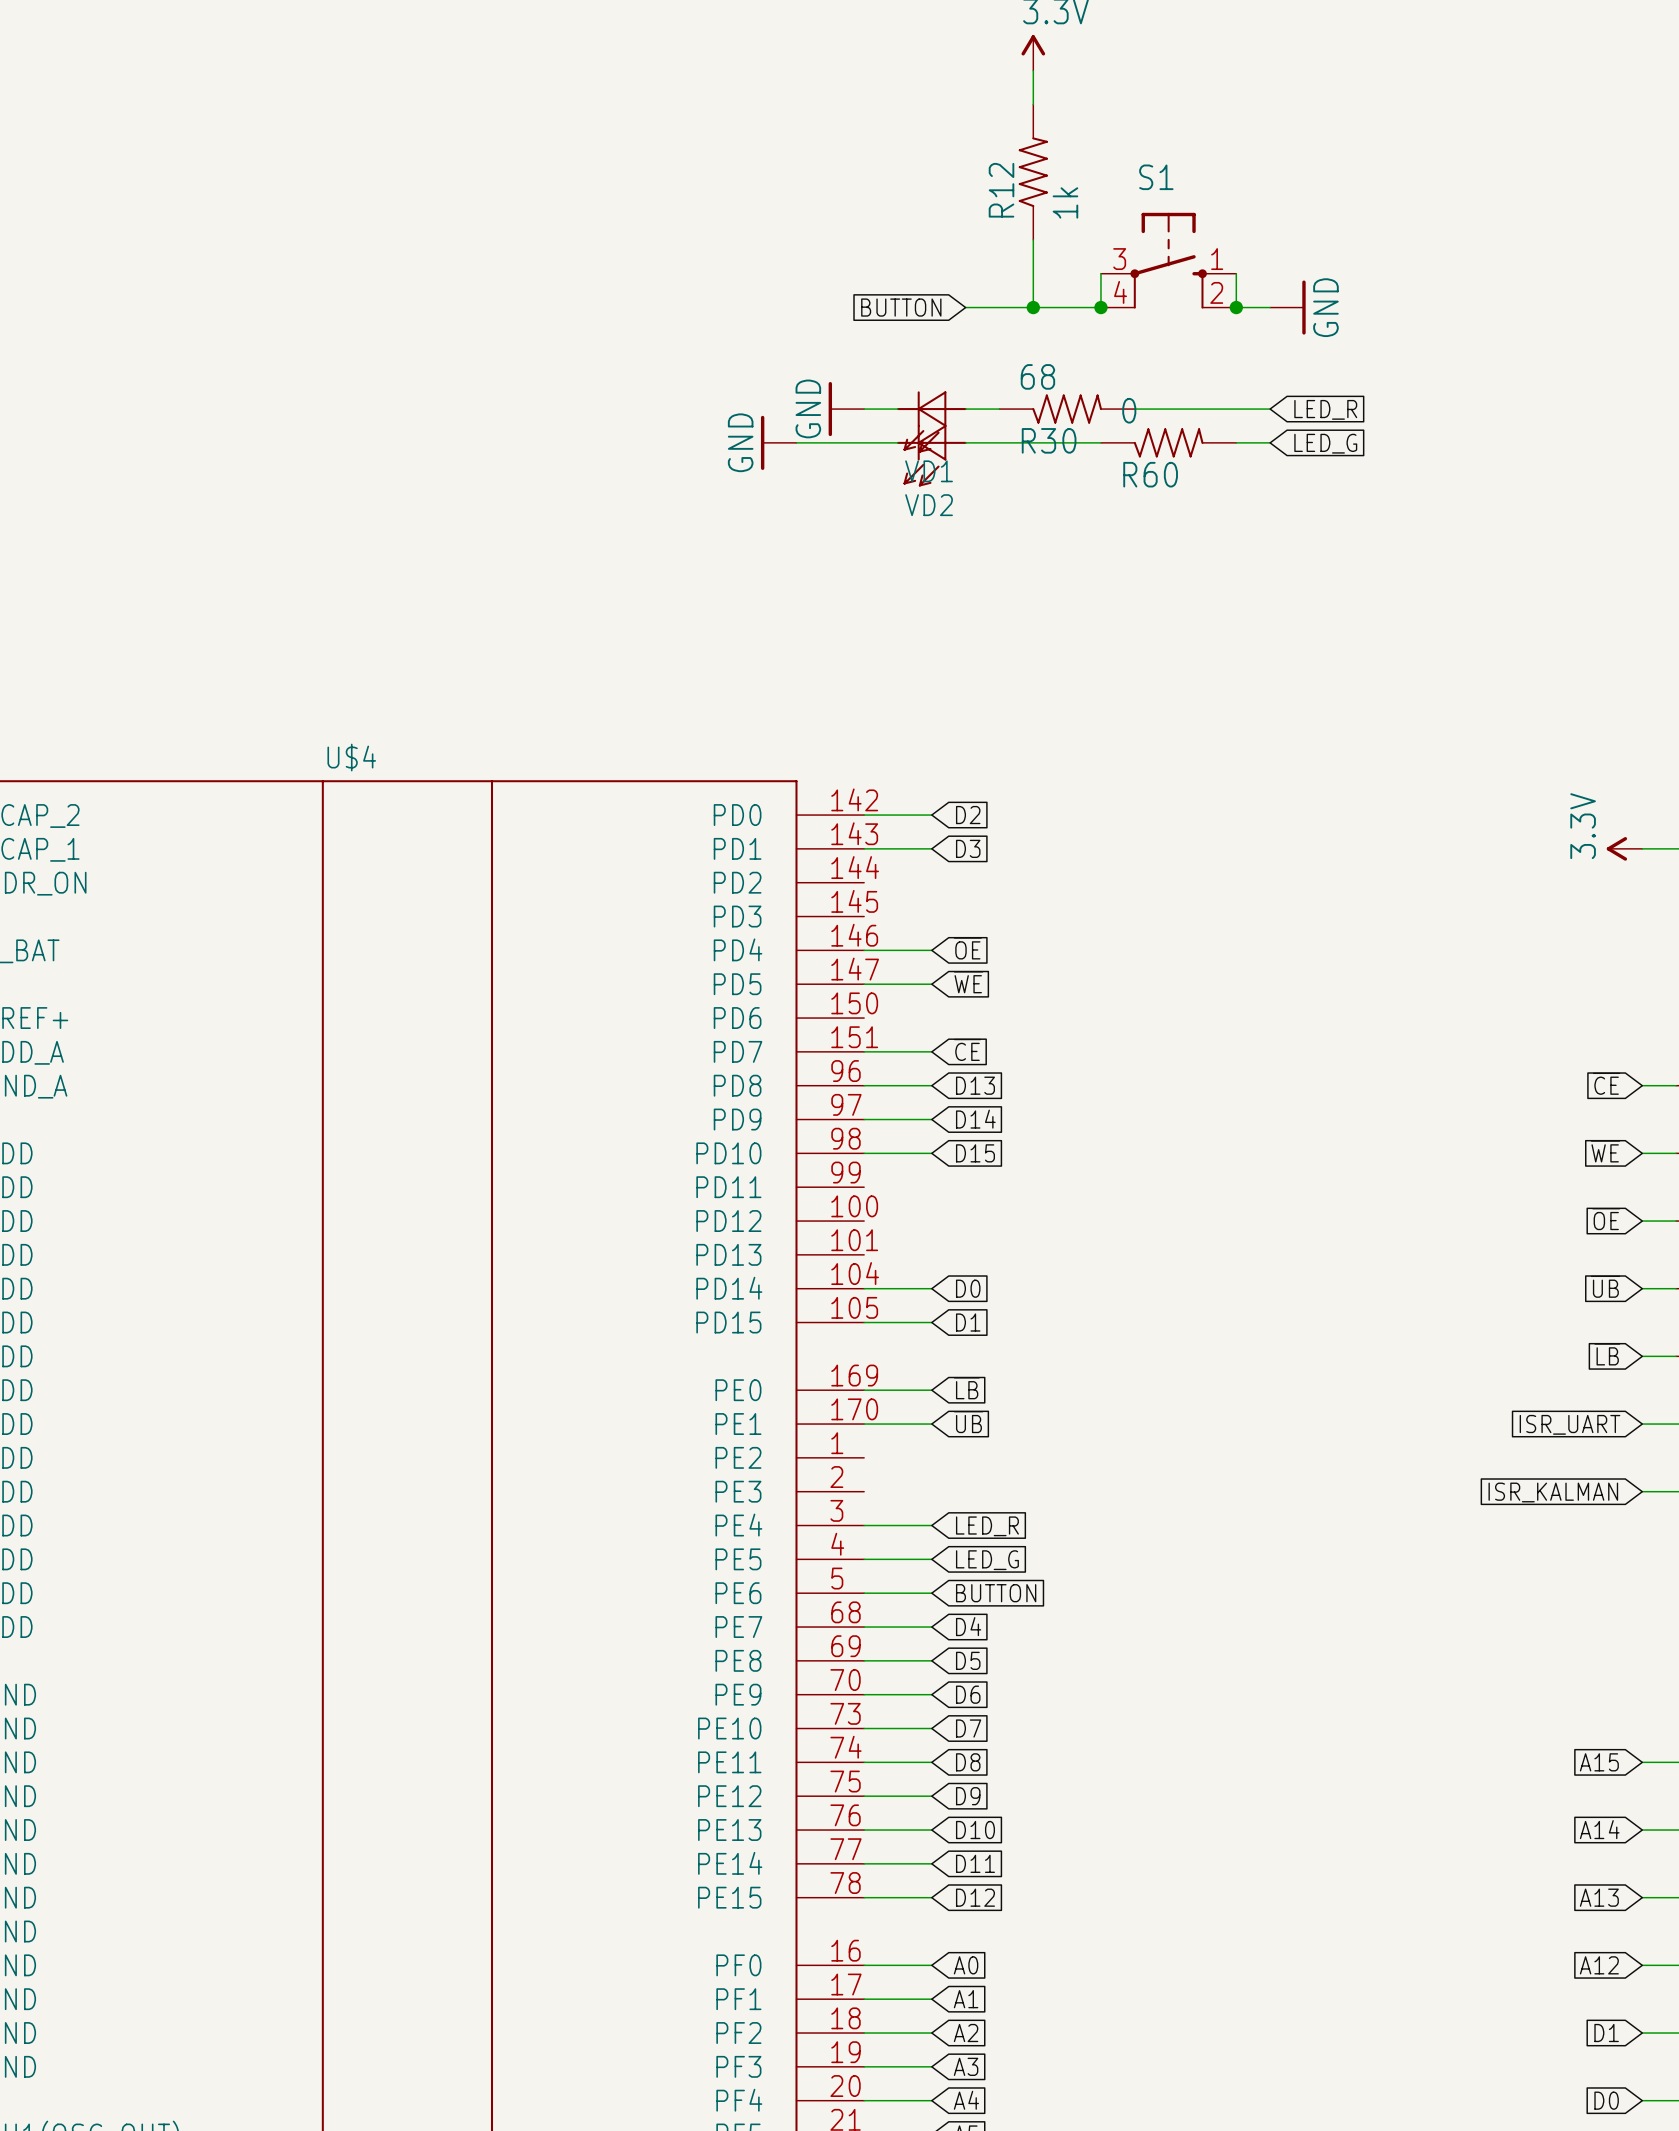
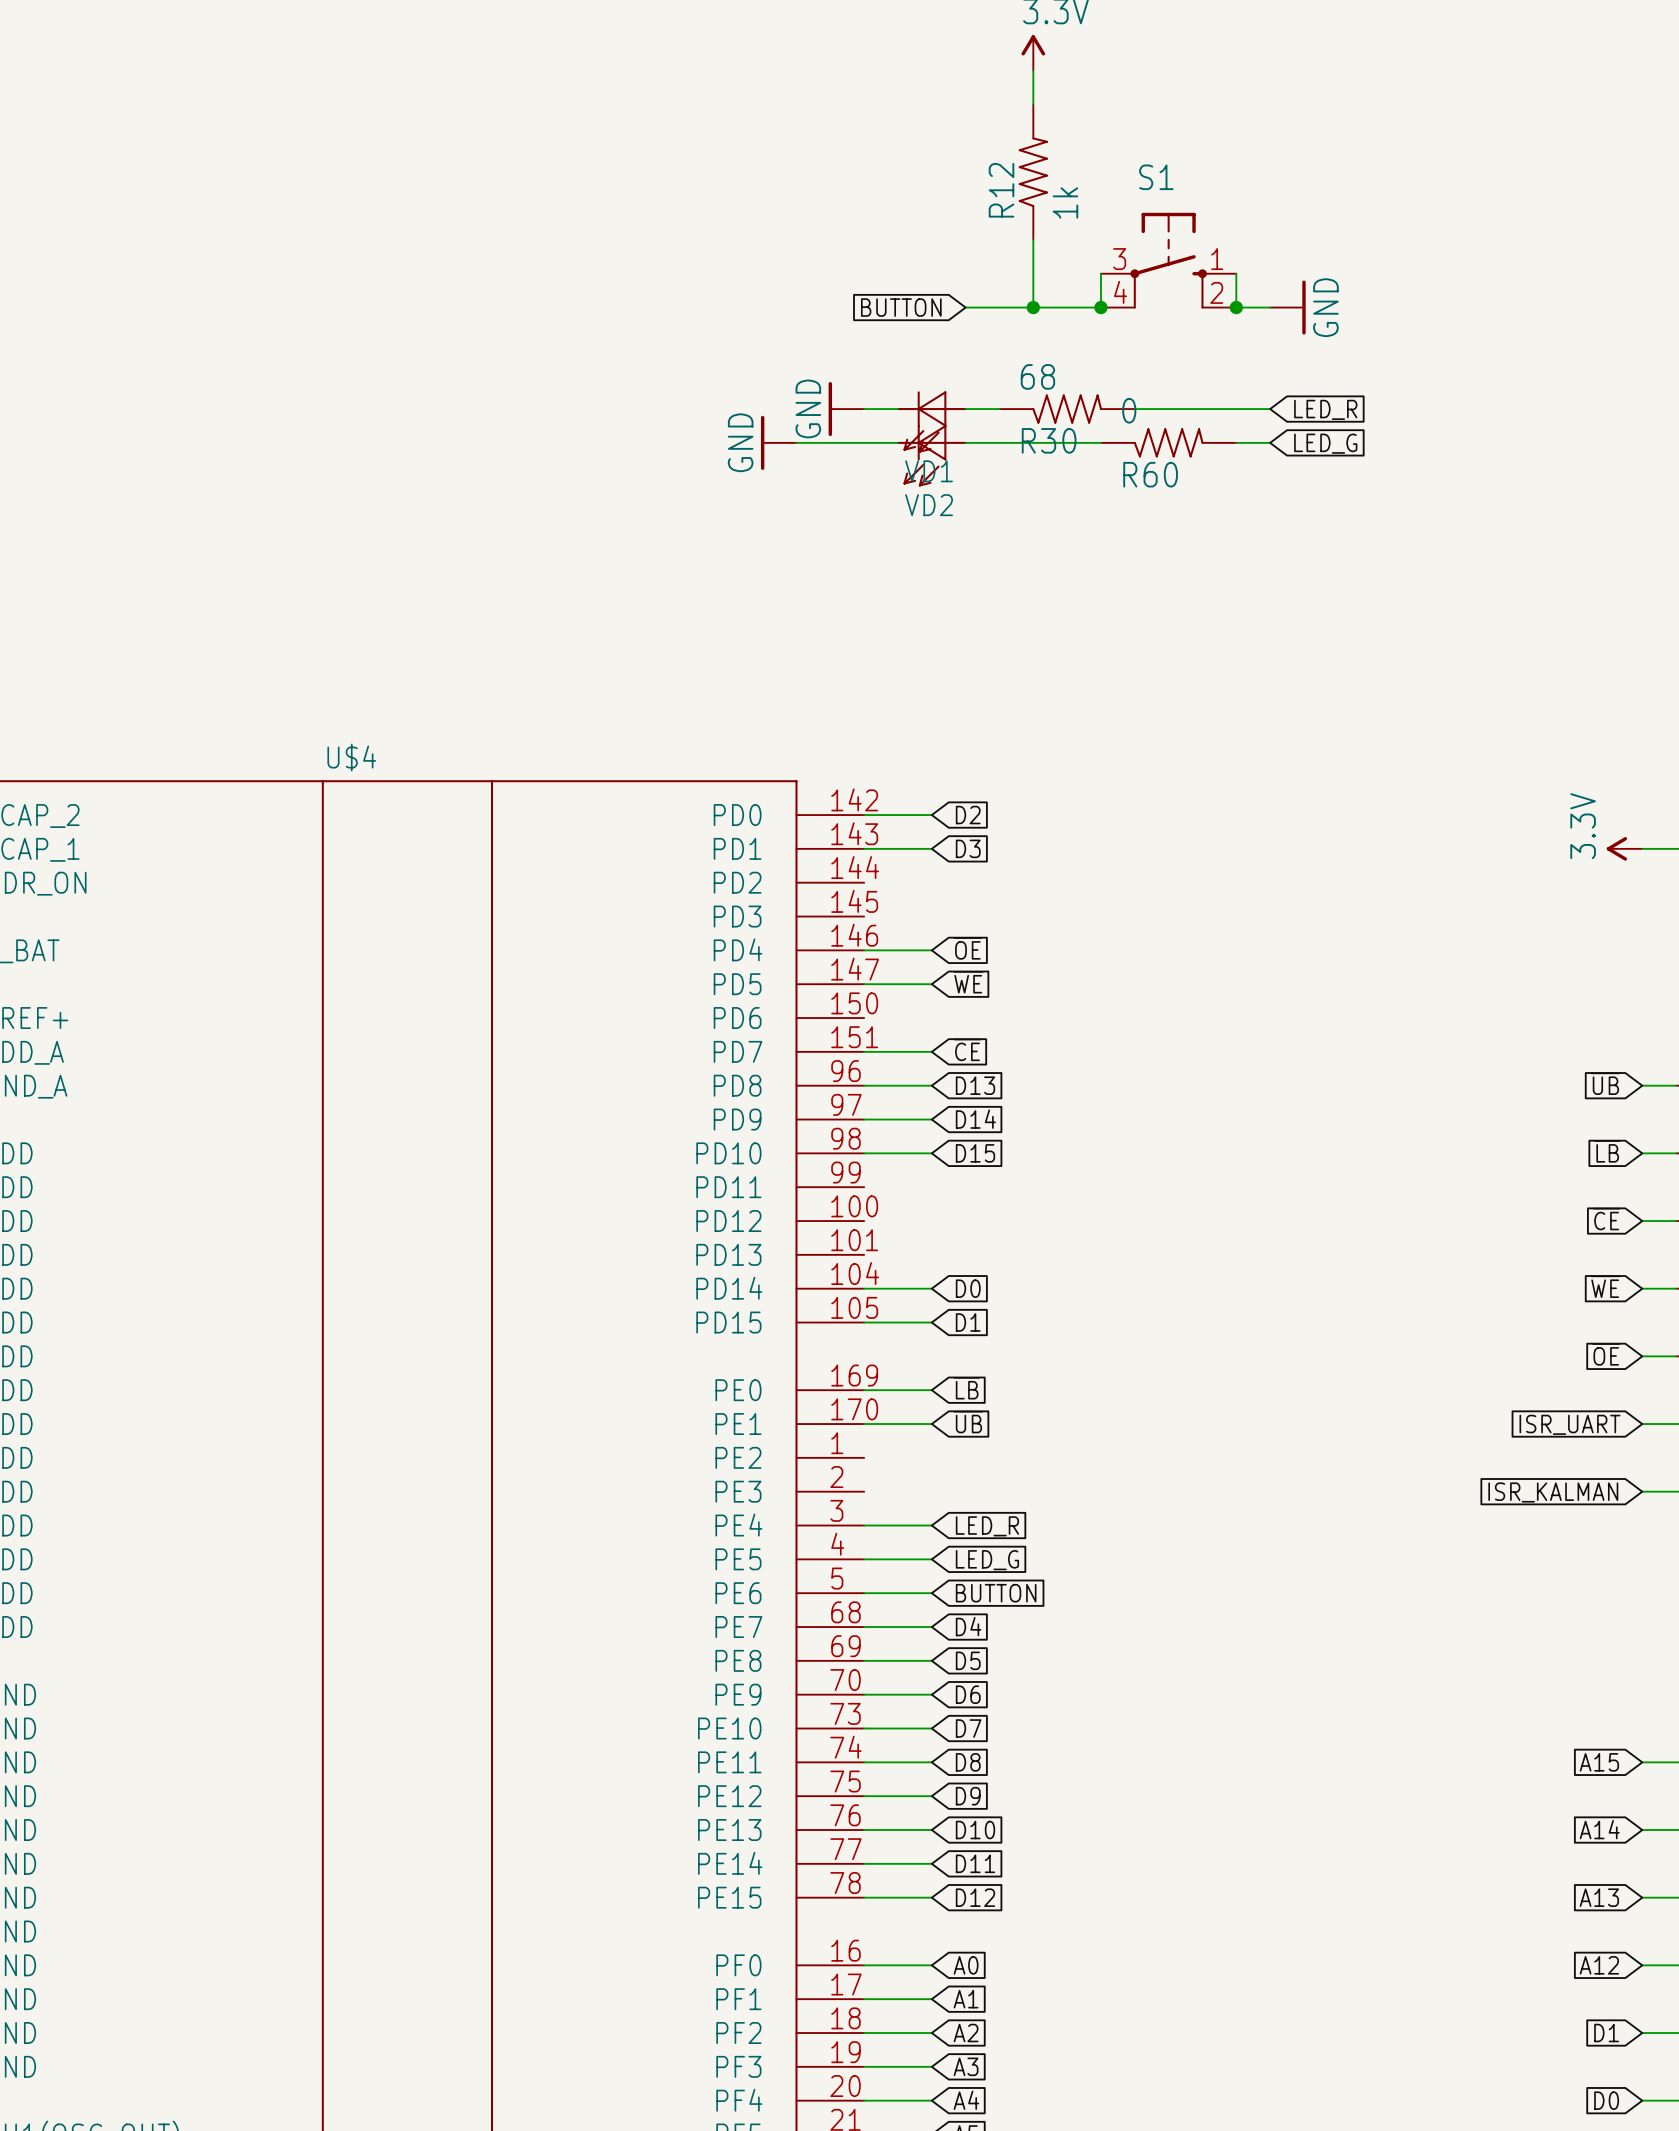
global label: ~{CE} (1606, 1083) -> ~{UB} (1605, 1083)
global label: ~{WE} (1605, 1151) -> ~{LB} (1607, 1151)
global label: ~{OE} (1606, 1219) -> ~{CE} (1606, 1219)
global label: ~{UB} (1605, 1286) -> ~{WE} (1605, 1286)
global label: ~{LB} (1607, 1354) -> ~{OE} (1606, 1354)

